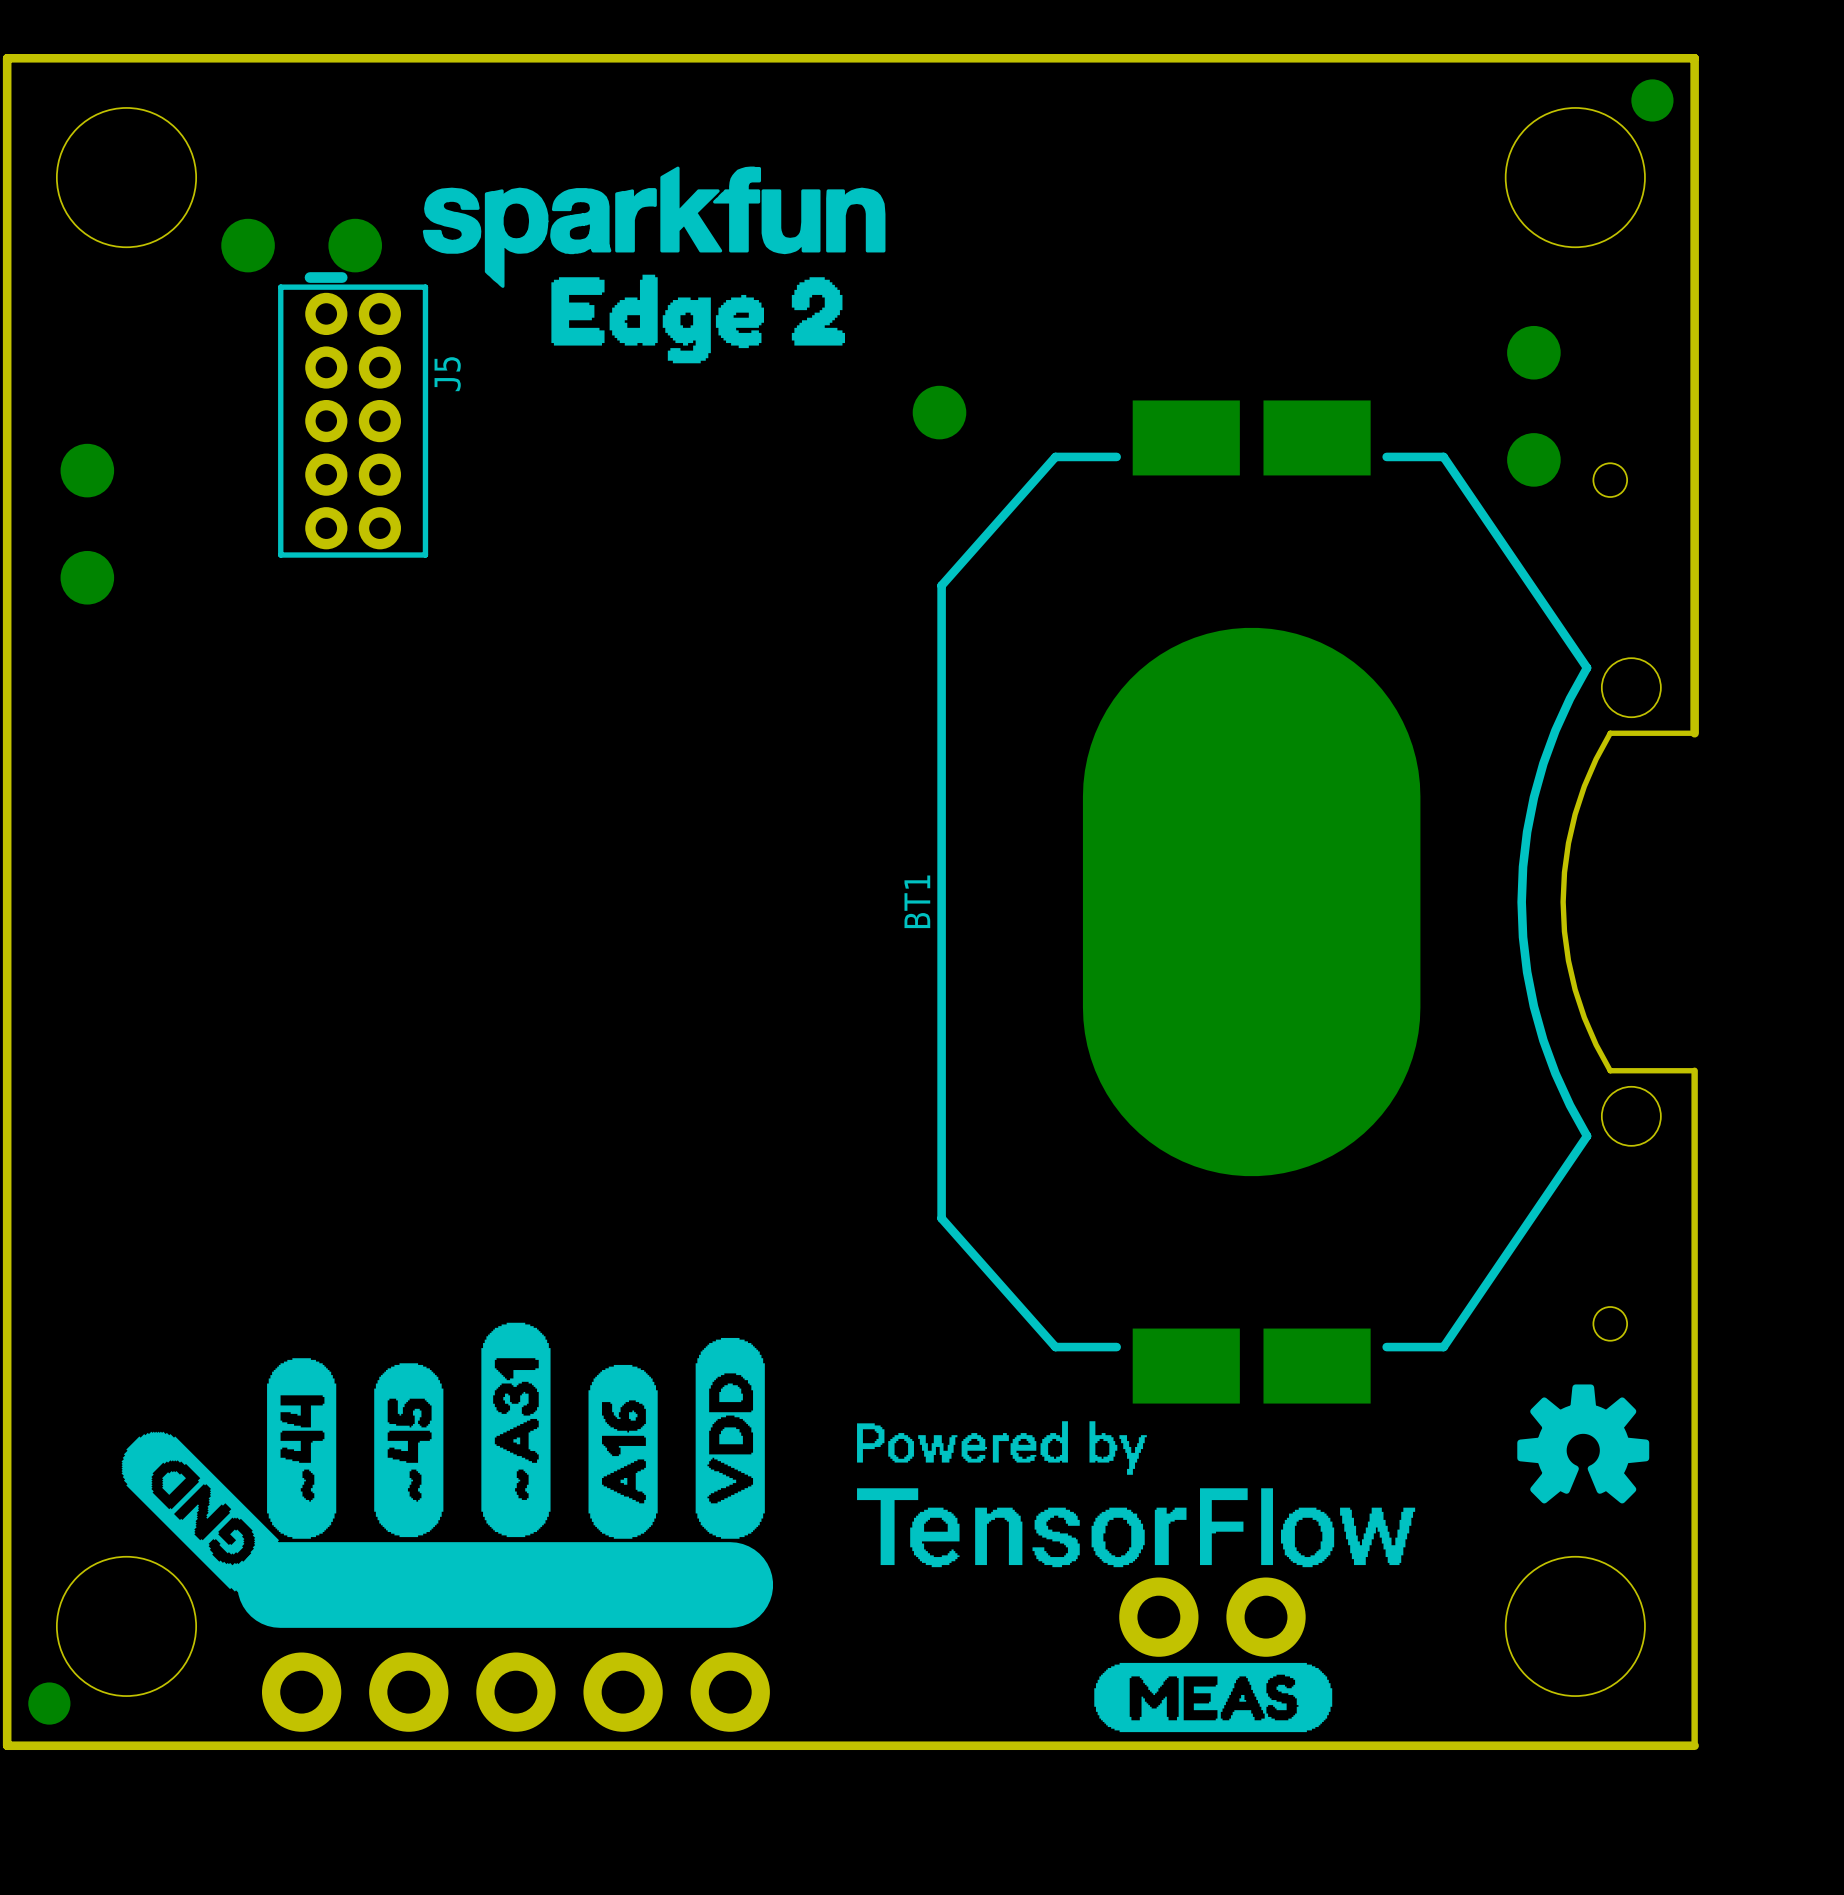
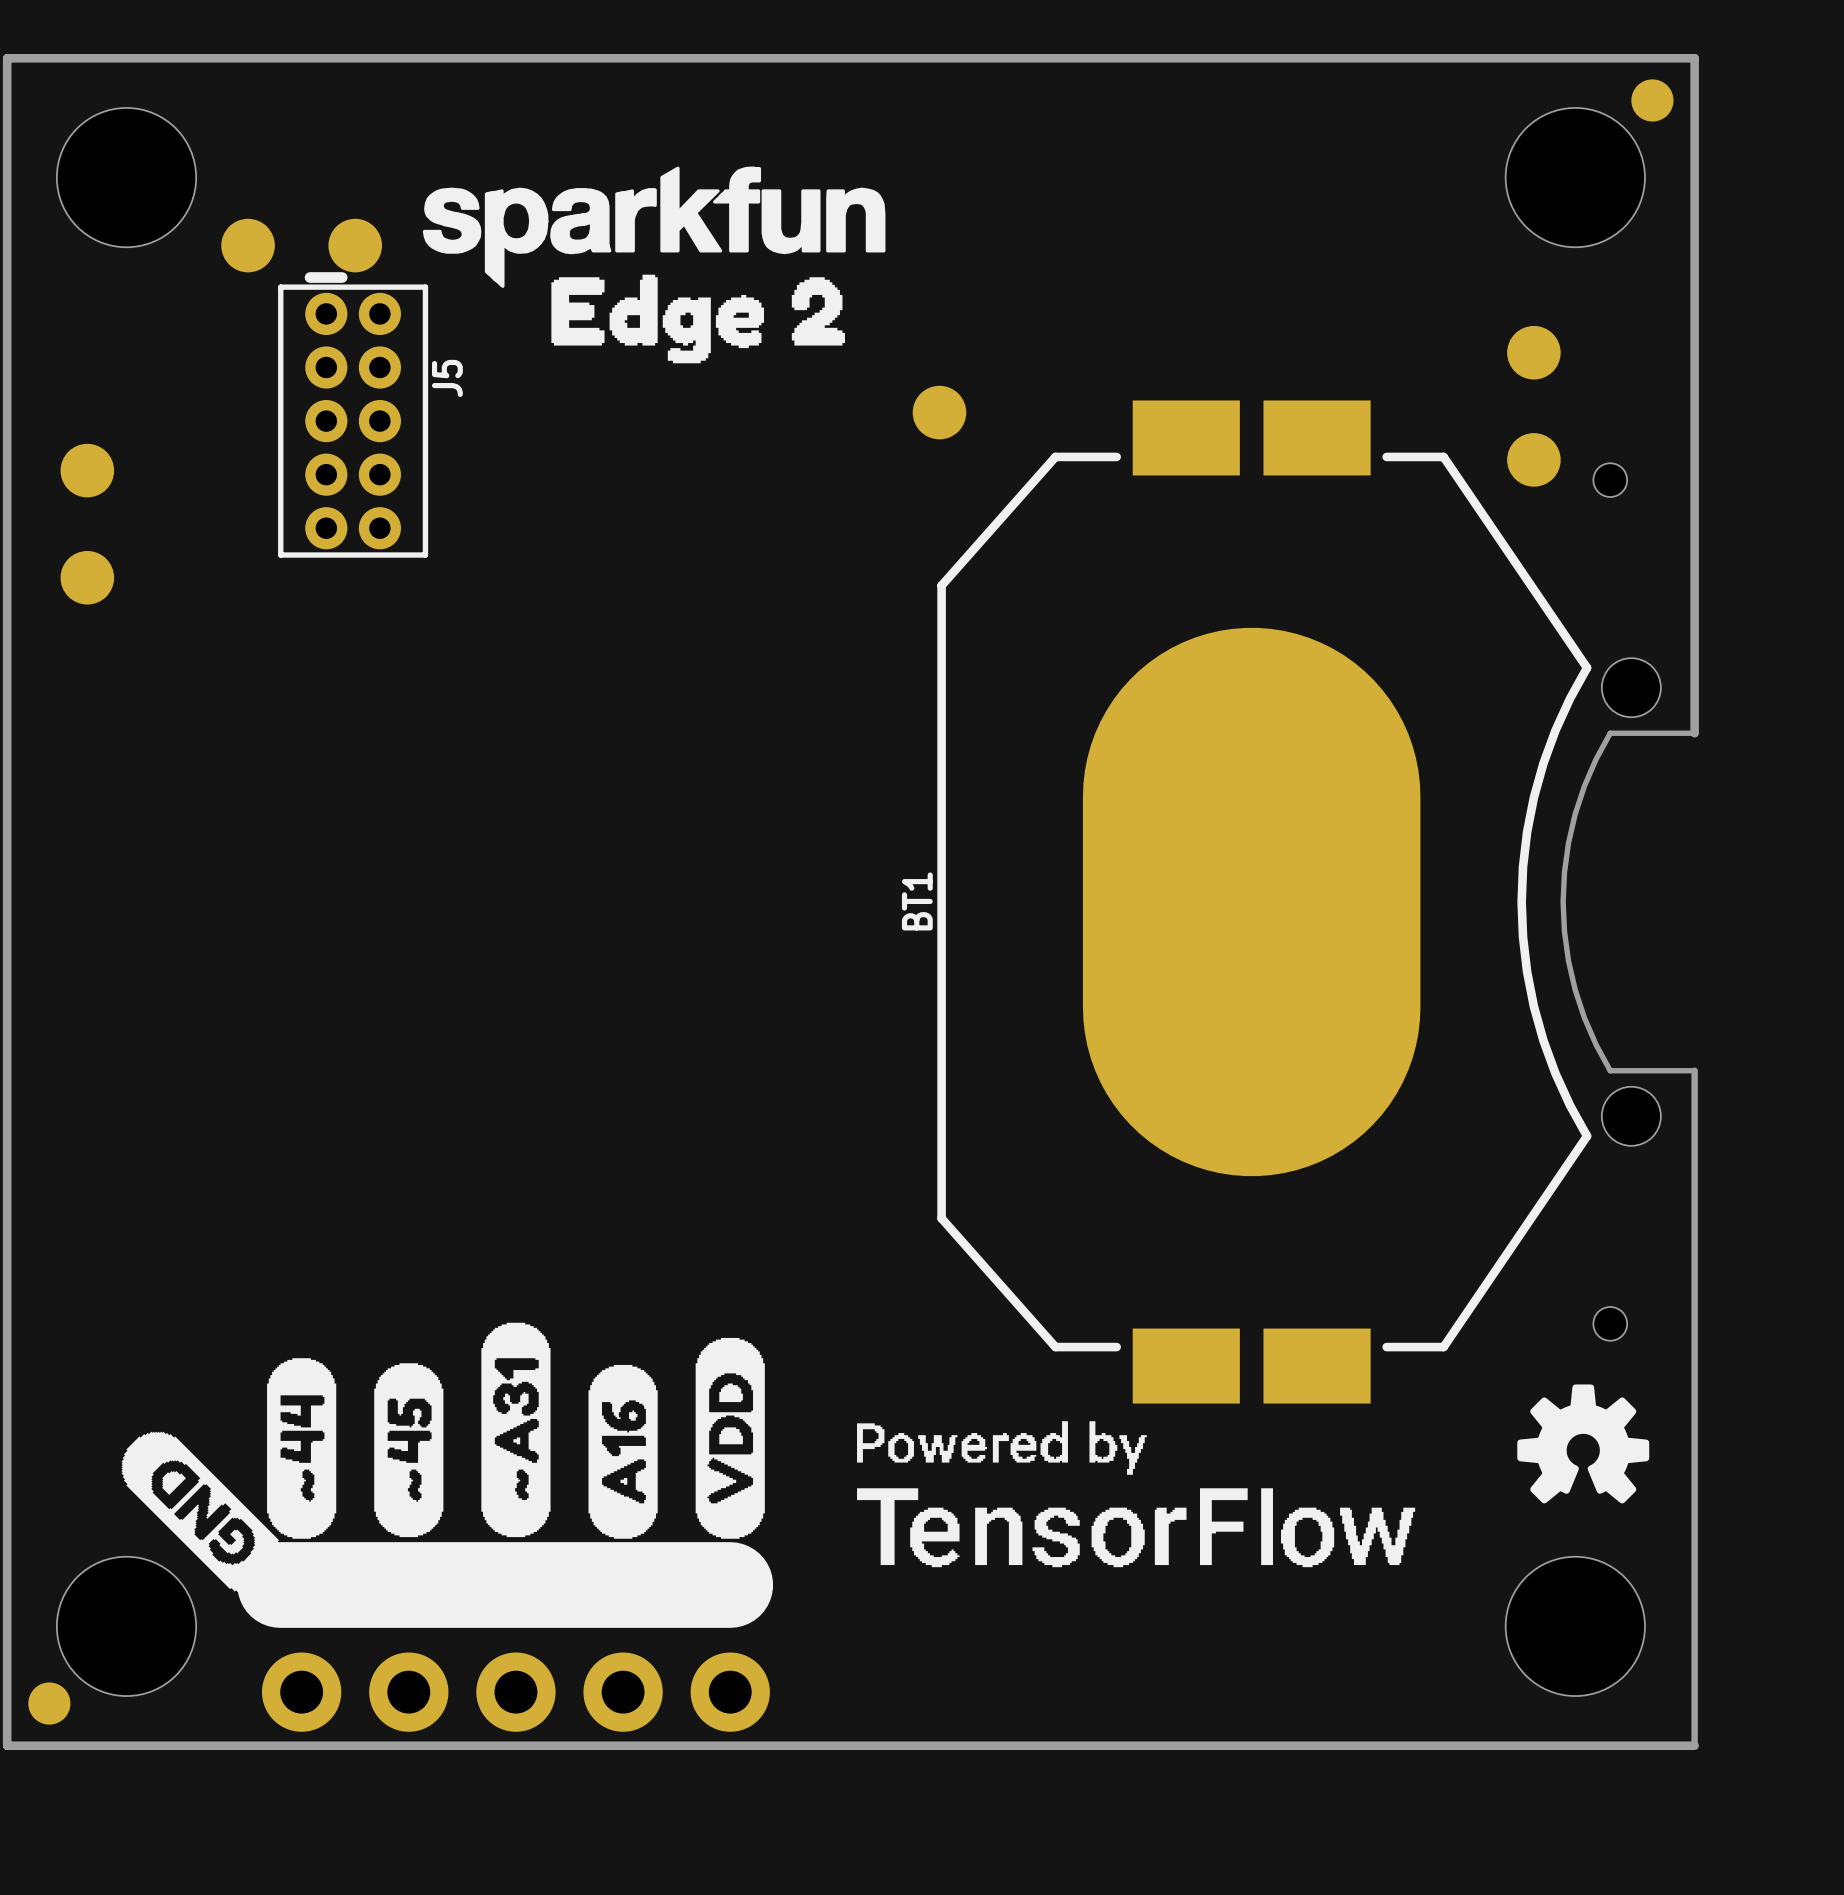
part: (1212, 1617) -> none
drawing: [1094, 1662, 1333, 1733] -> none

